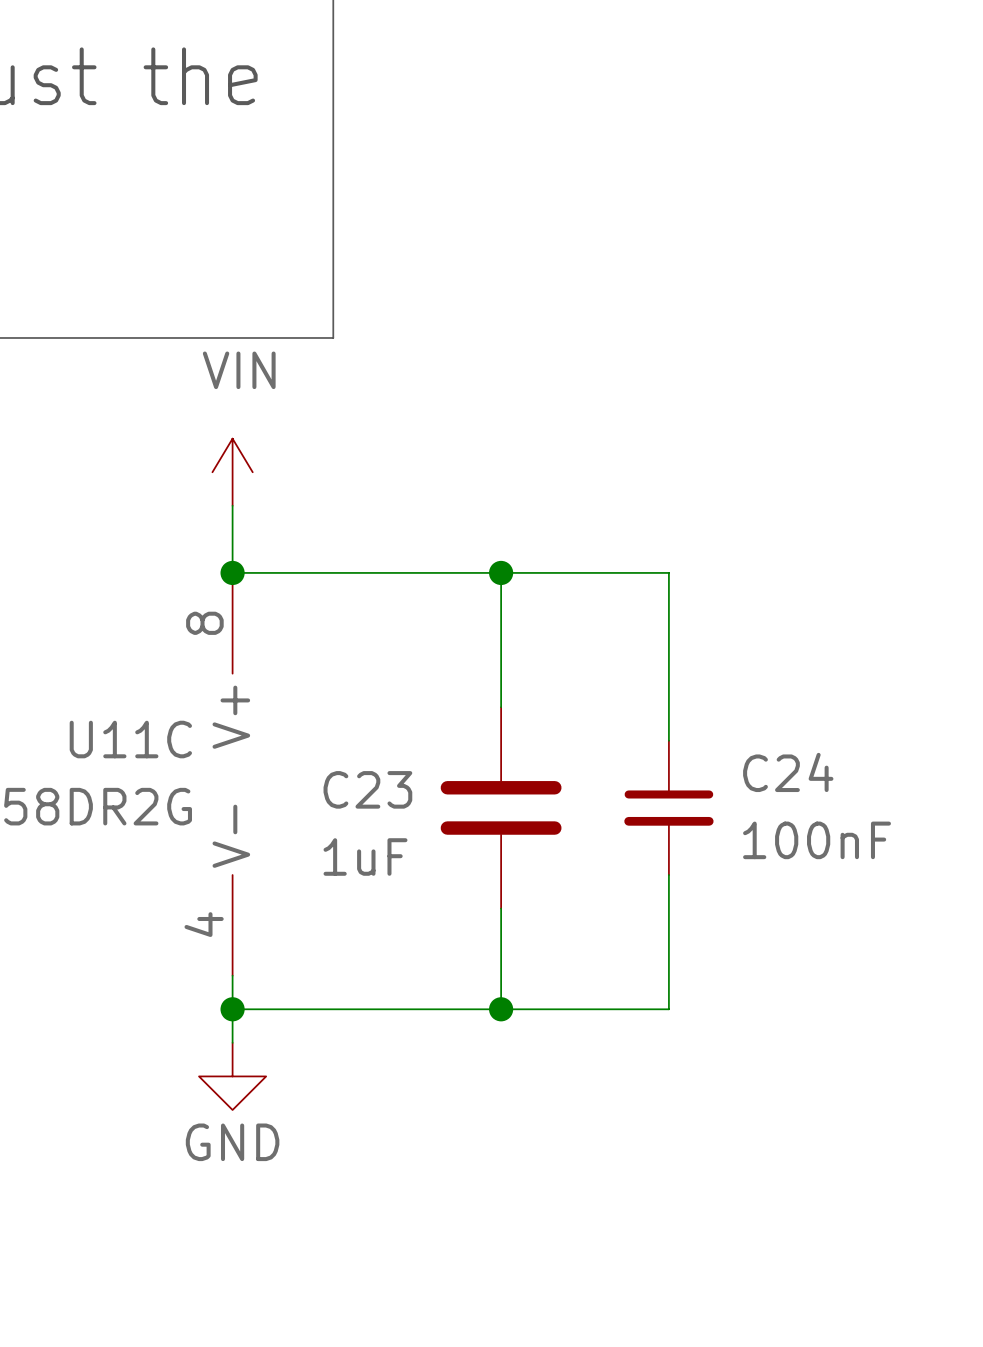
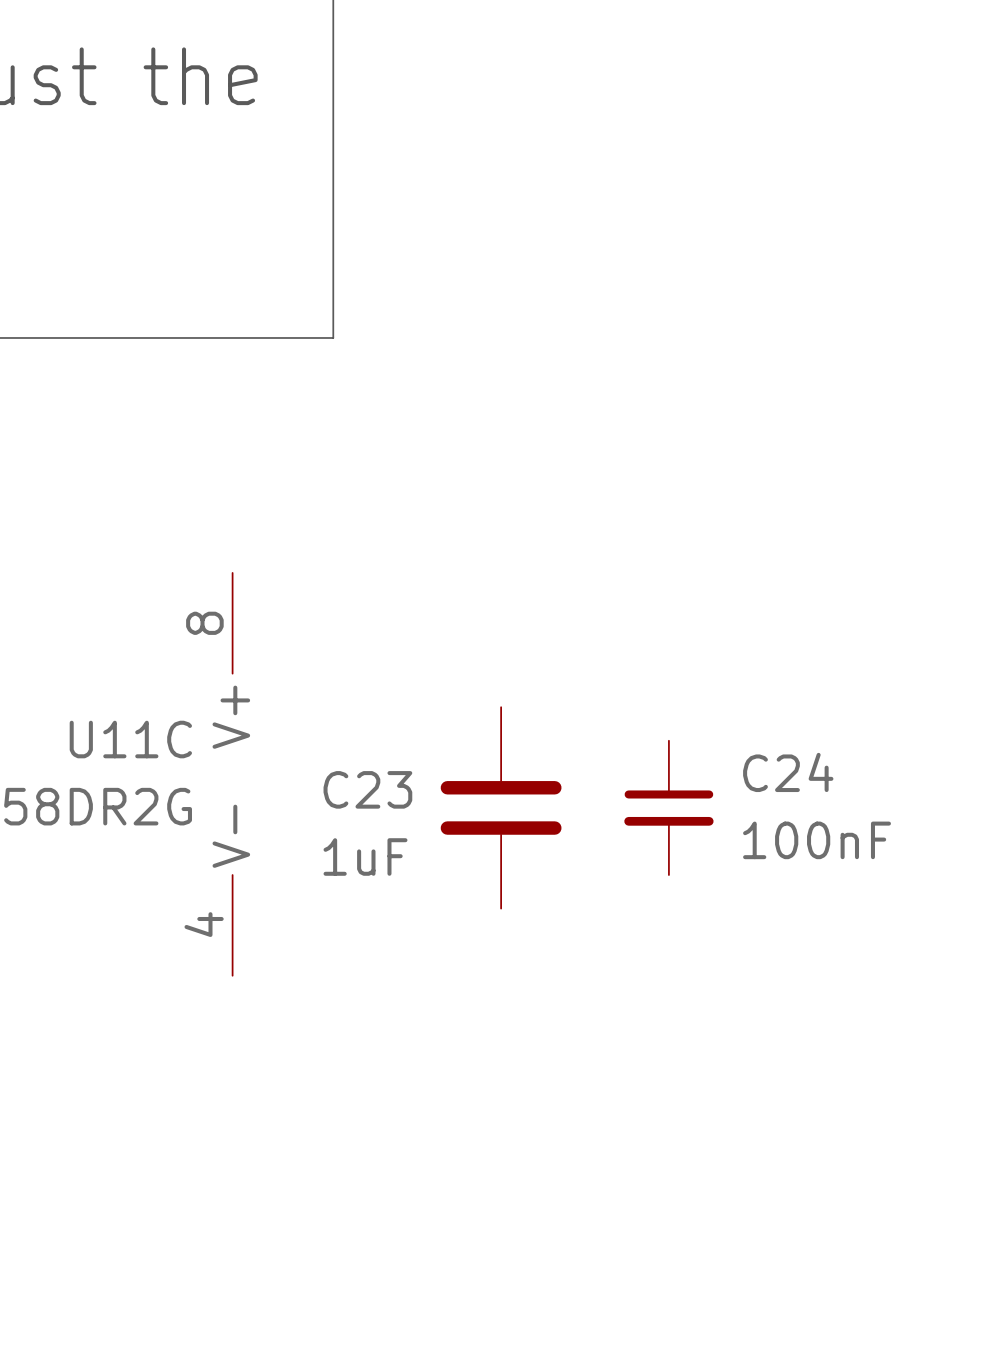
power symbol: VIN (232, 472) -> none
wire: (232, 505) (232, 572) (668, 572) (668, 740) -> none
junction: (232, 572) -> none
wire: (501, 572) (501, 707) -> none
junction: (501, 572) -> none
wire: (668, 875) (668, 1009) (232, 1009) -> none
wire: (501, 908) (501, 1009) -> none
wire: (232, 975) (232, 1042) -> none
junction: (232, 1009) -> none
junction: (501, 1009) -> none
power symbol: GND (232, 1076) -> none

